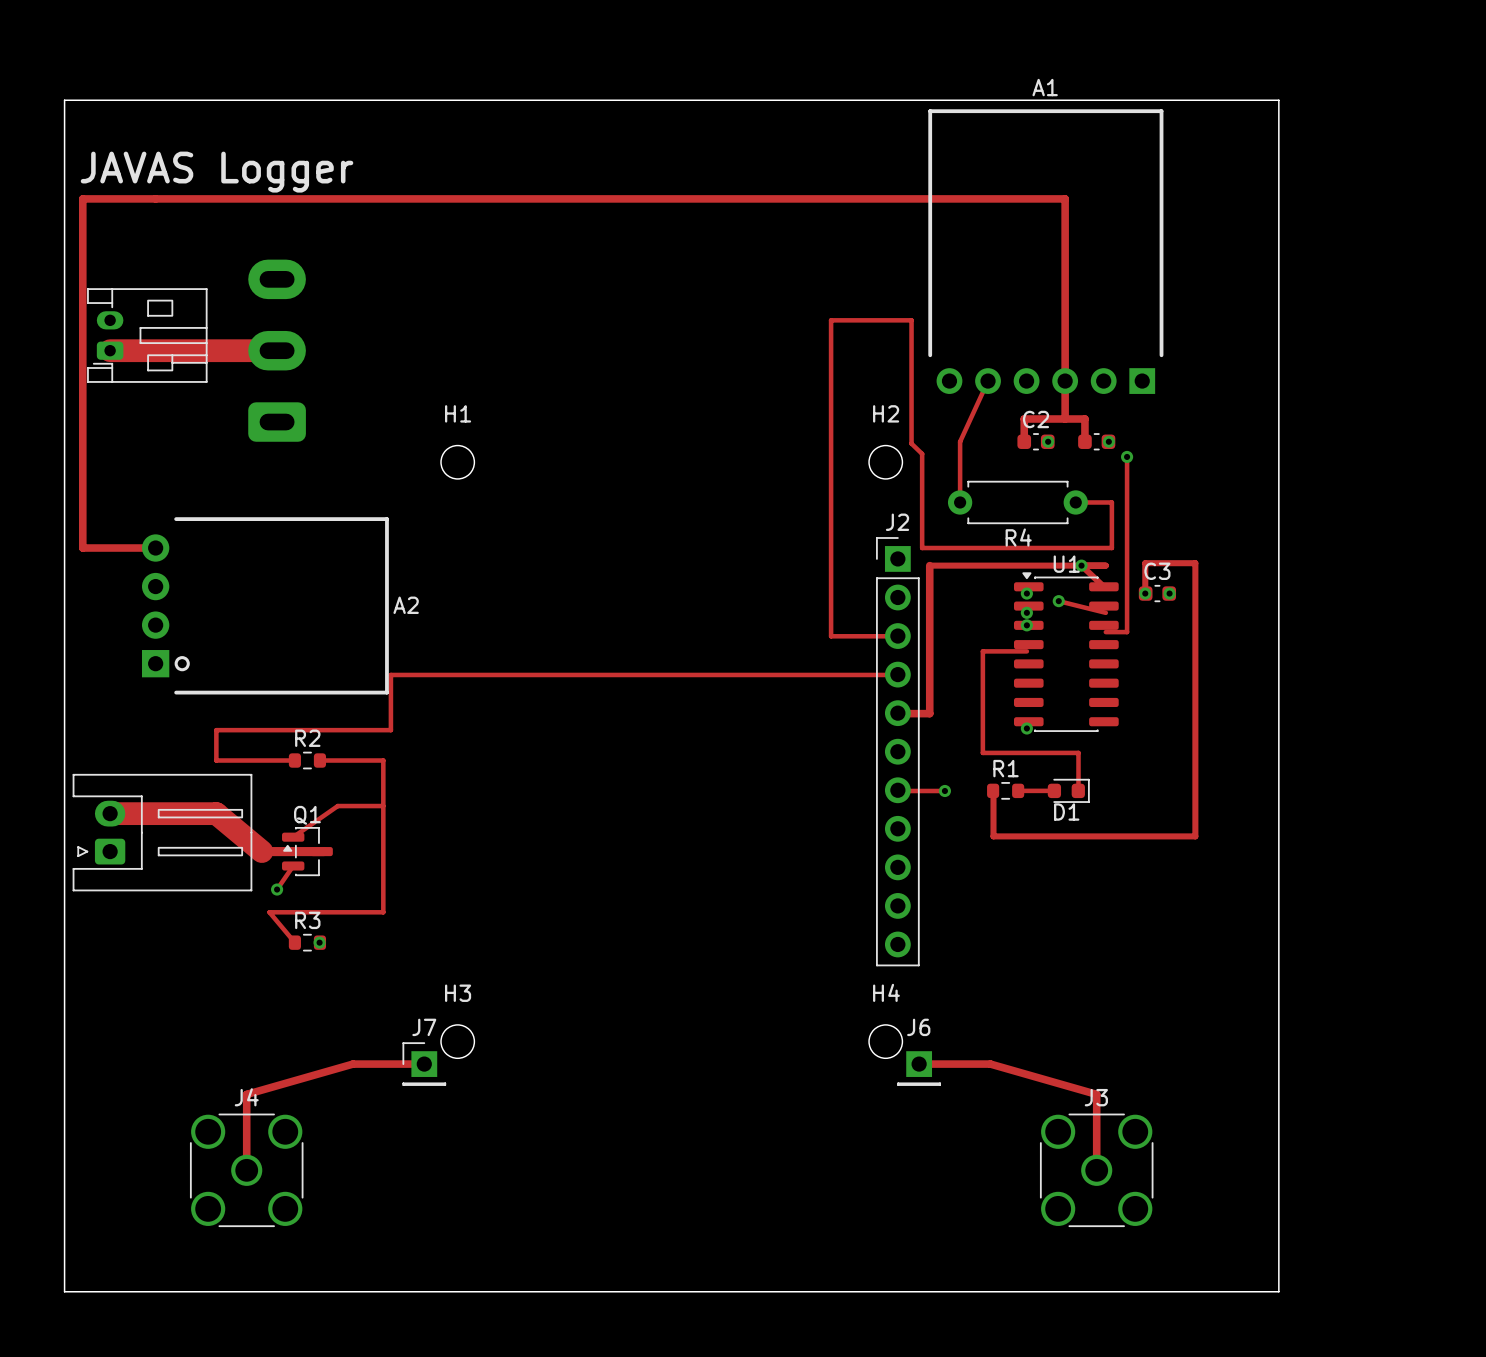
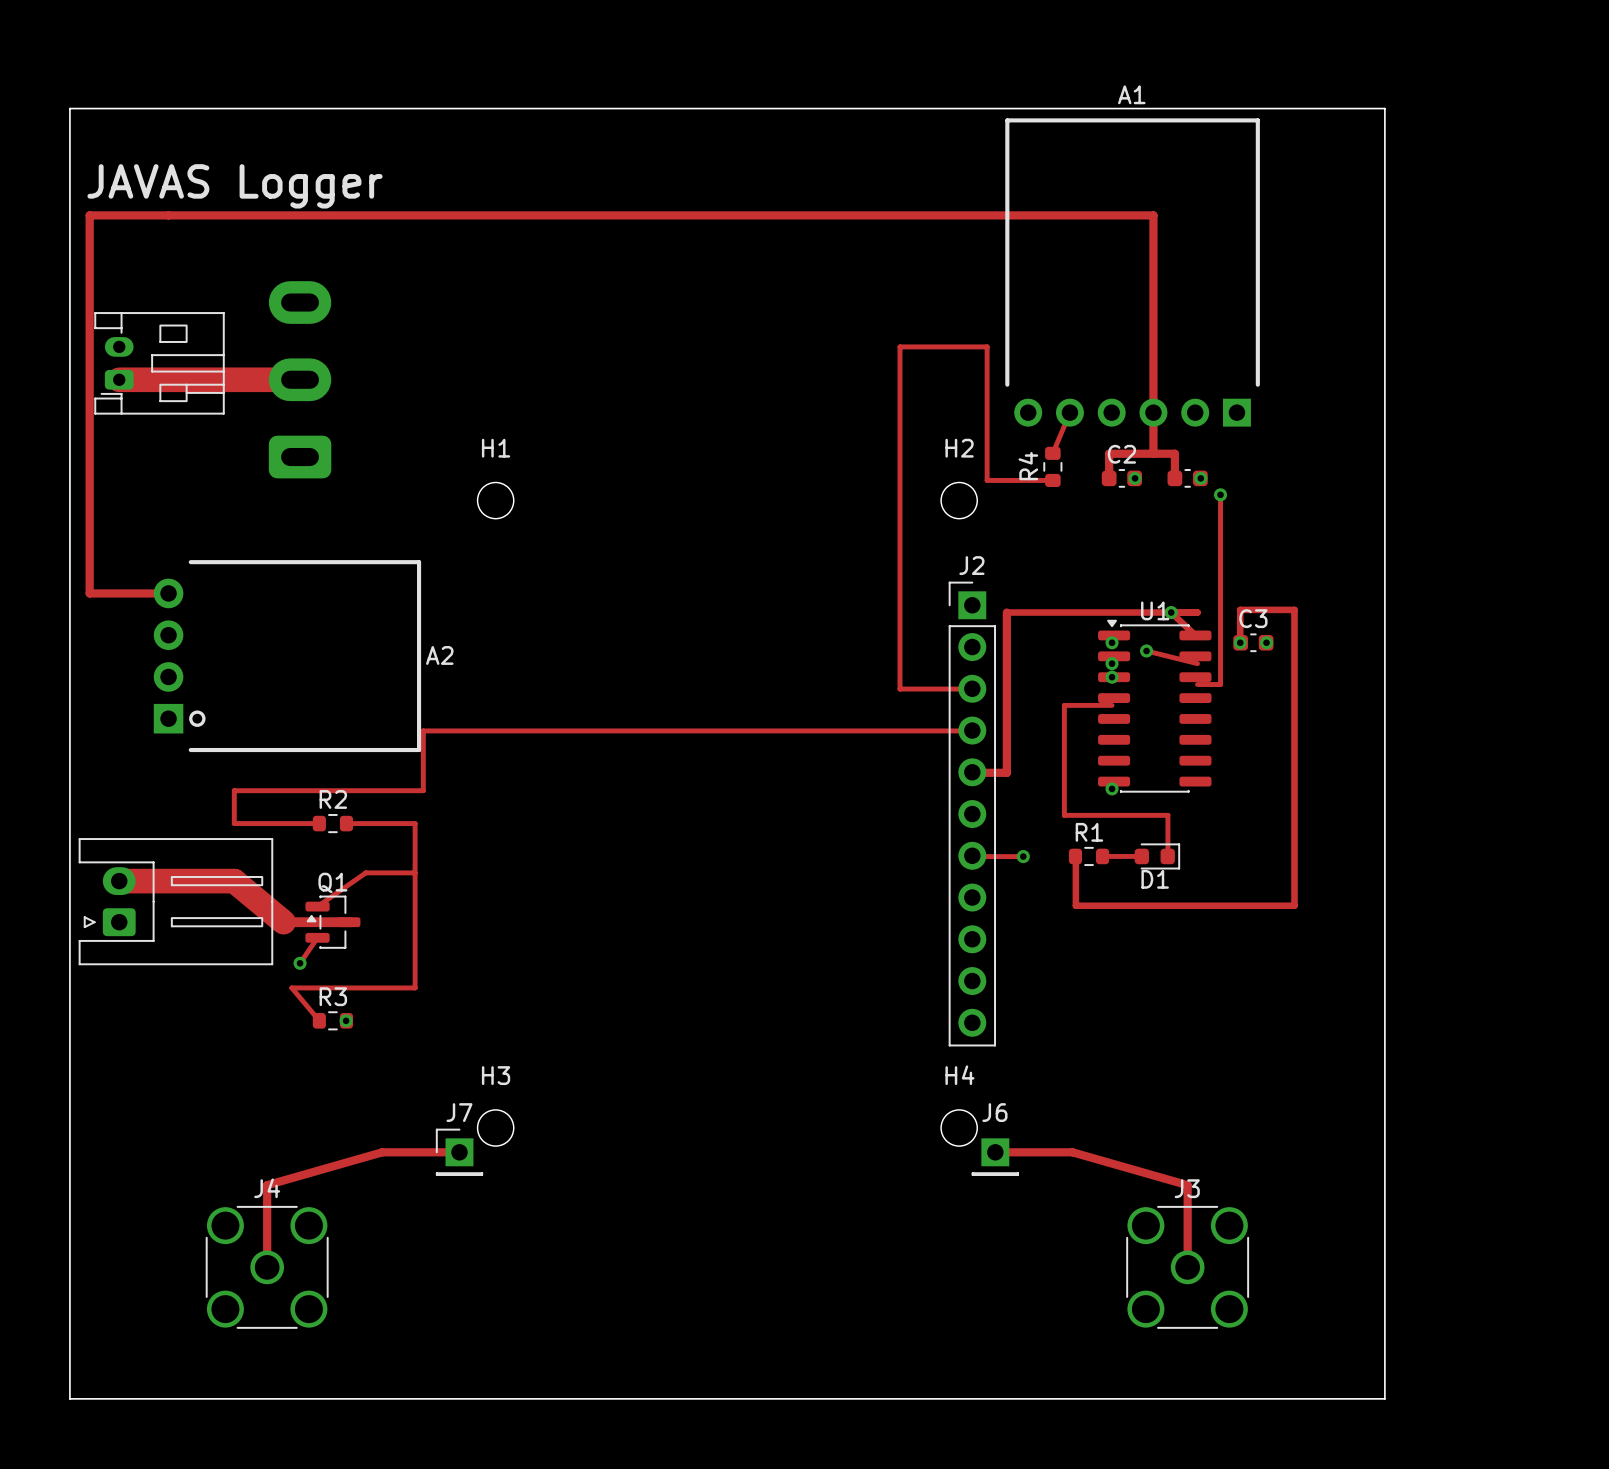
track: (988, 381) (960, 441) (960, 502) -> (1069, 412) (1052, 453)
track: (911, 443) (922, 453) (922, 548) (1111, 548) (1111, 502) (1075, 502) -> (987, 480) (1052, 480)
R4 footprint: [947, 480, 1088, 525] -> [1043, 446, 1063, 488]
R4 name position: R4 (1018, 537) -> R4 (1028, 466)

